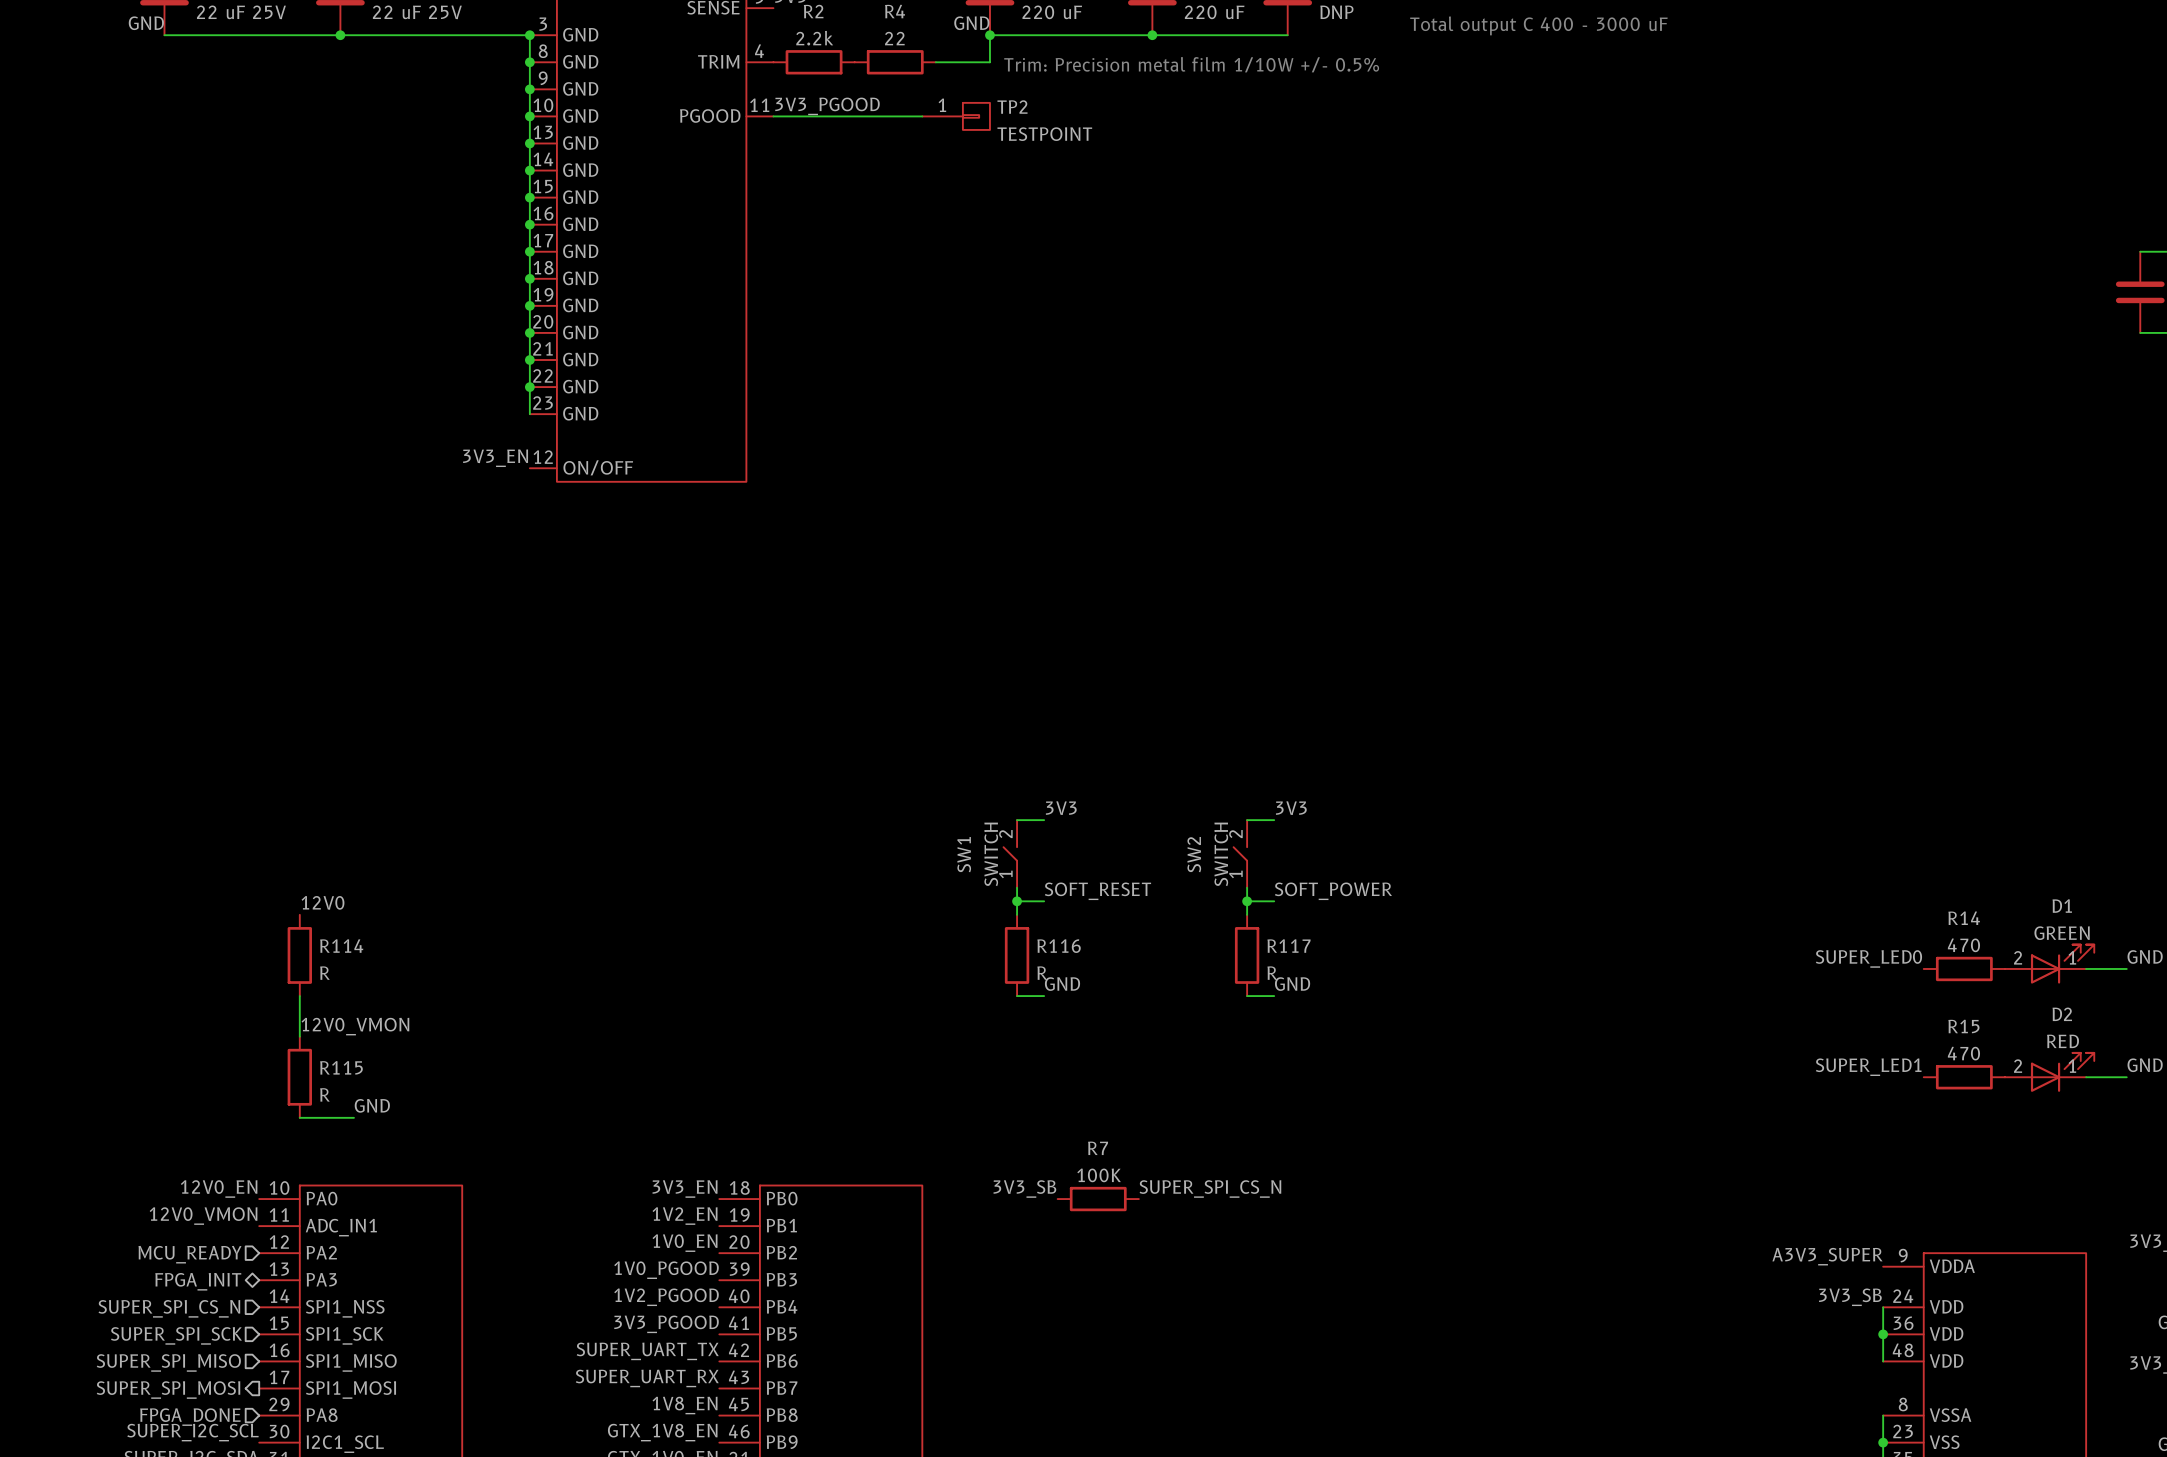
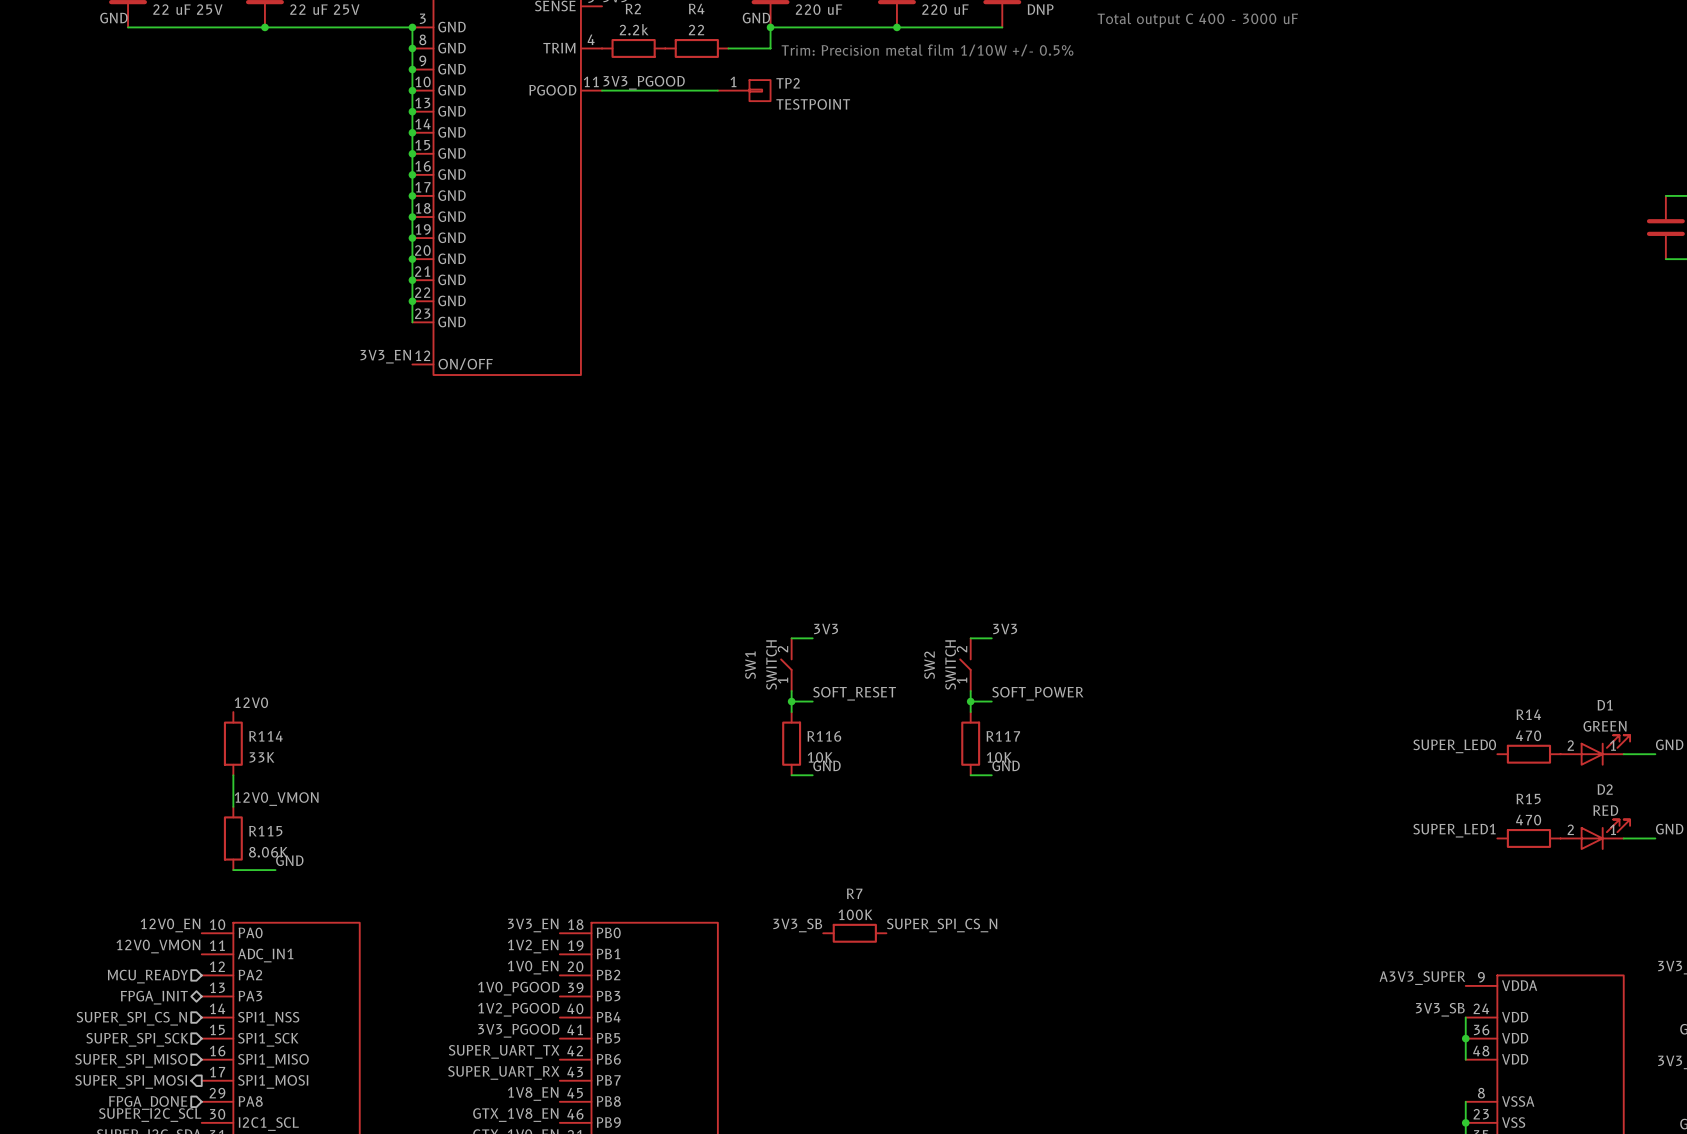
R114 value: R (324, 973) -> 33K (261, 757)
R116 value: R (1042, 973) -> 10K (820, 757)
R117 value: R (1272, 973) -> 10K (999, 757)
R115 value: R (324, 1094) -> 8.06K (268, 852)

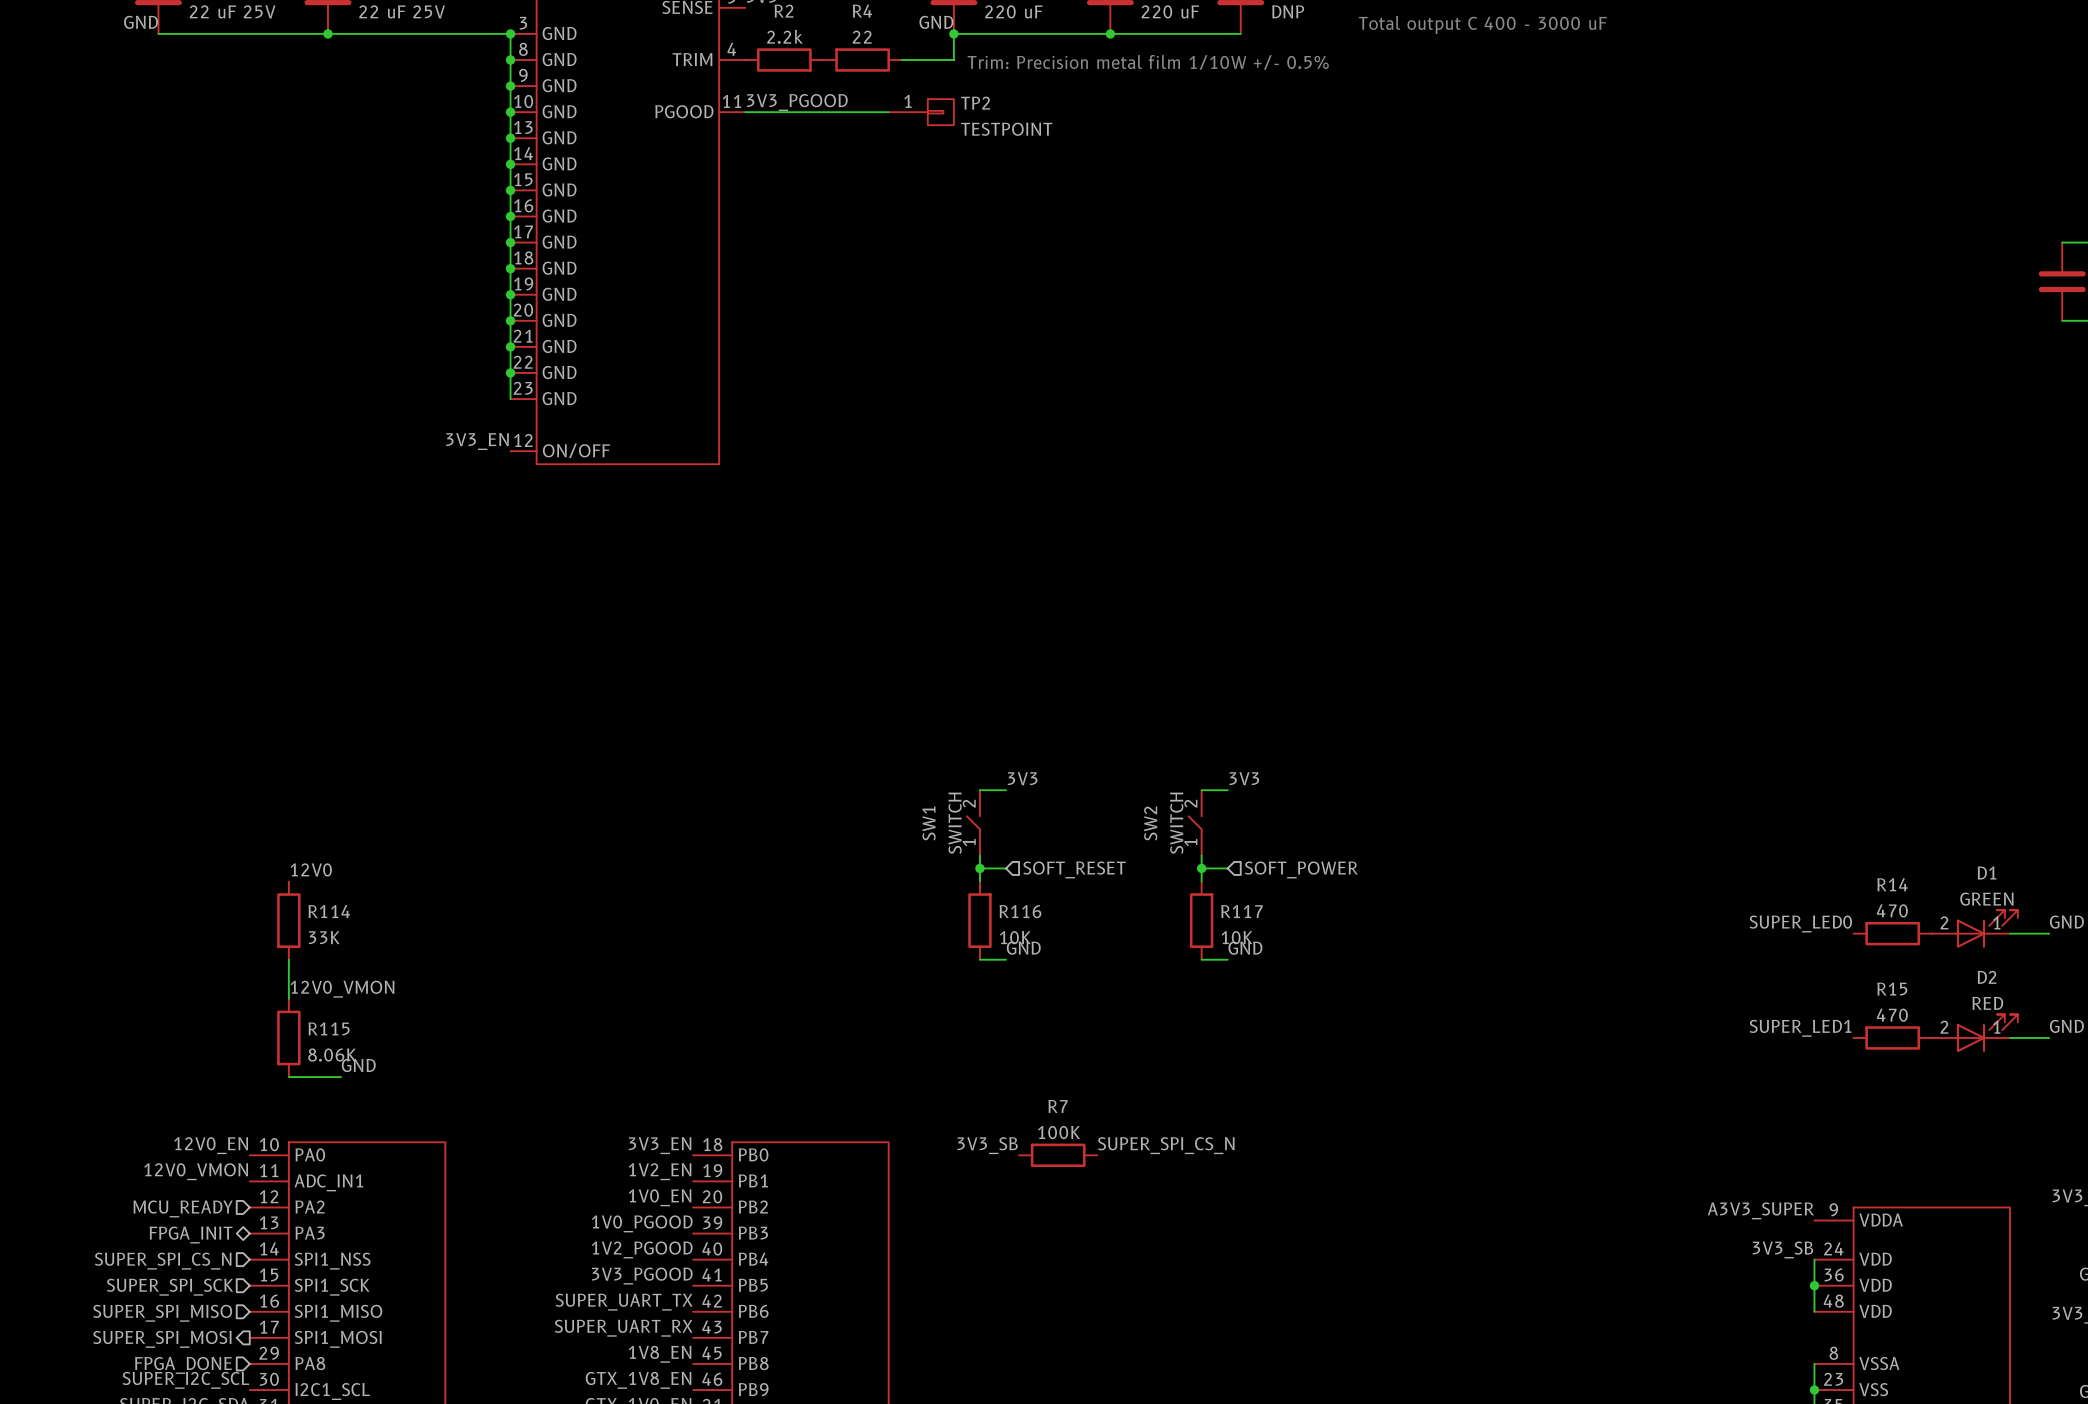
label: SOFT_RESET (854, 693) -> none
label: SOFT_POWER (1037, 693) -> none
hierarchical label: none -> SOFT_RESET (1074, 869)
hierarchical label: none -> SOFT_POWER (1301, 869)

